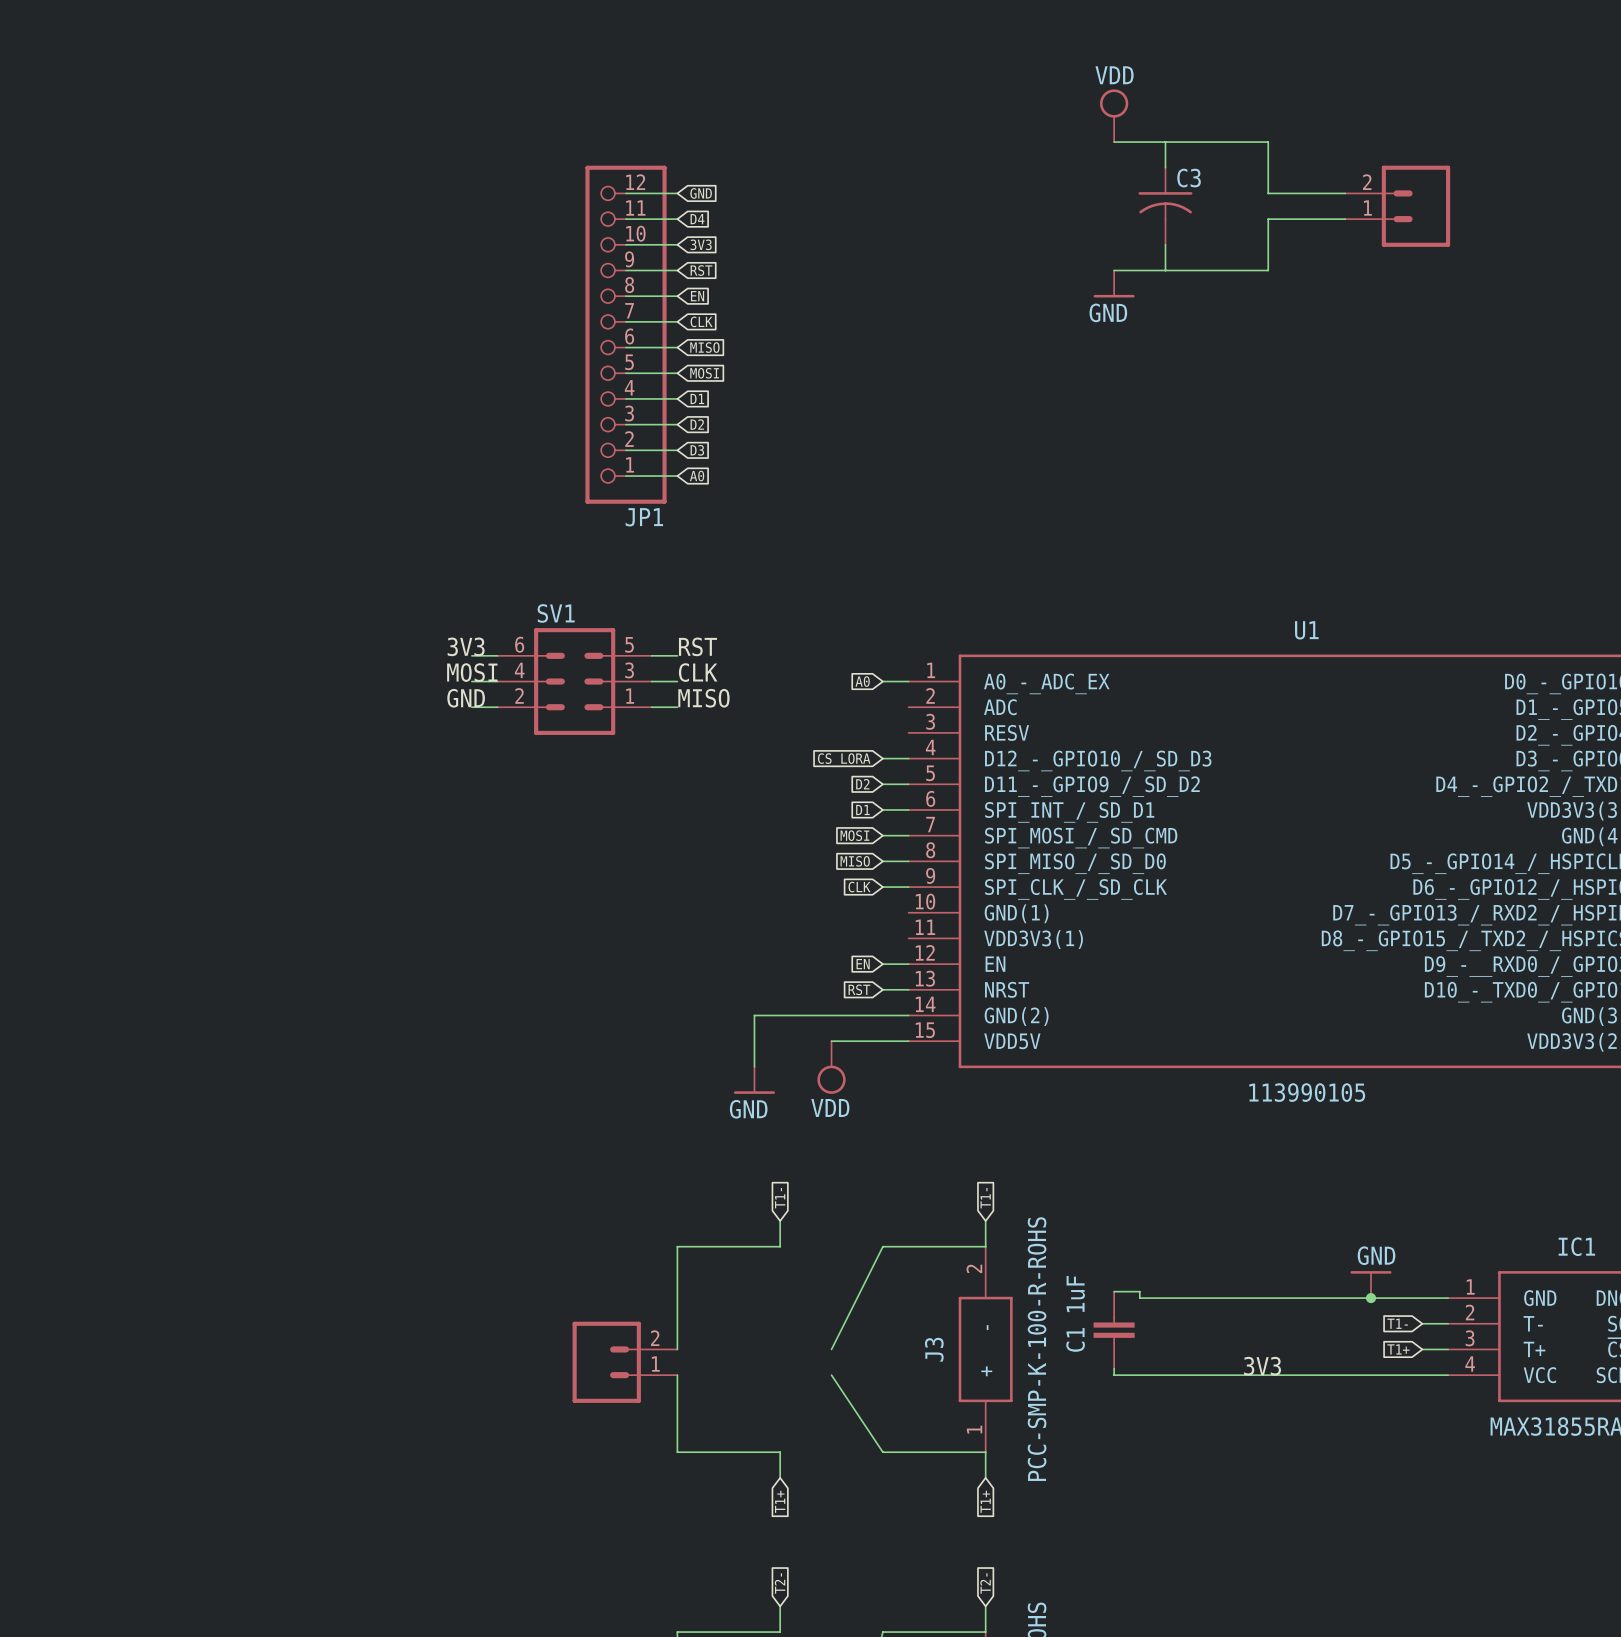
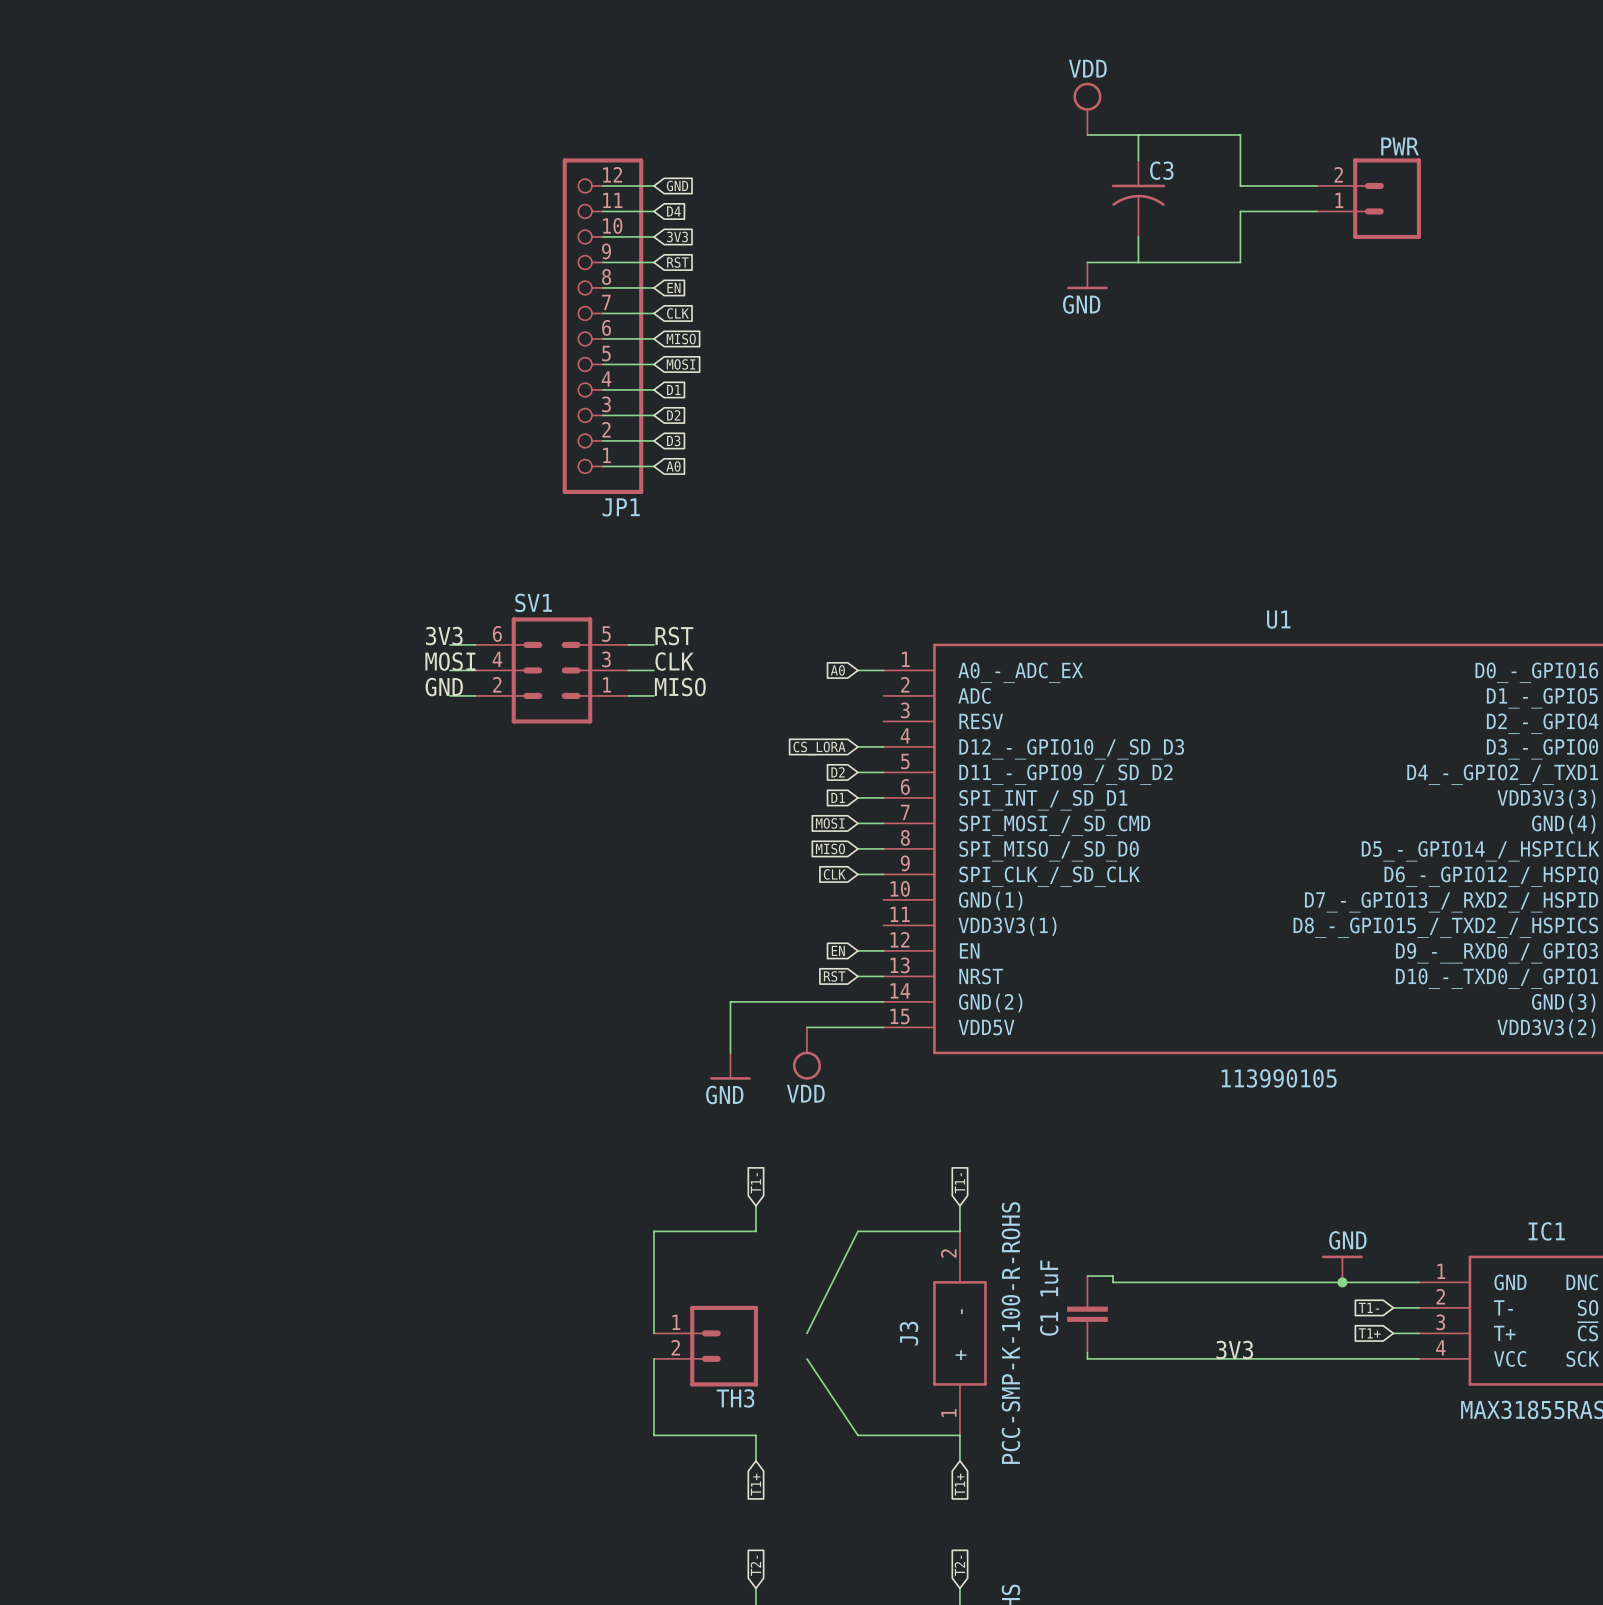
PWR name: none -> PWR (1400, 146)
part: (624, 1362) -> none
TH3: none -> (705, 1346)

